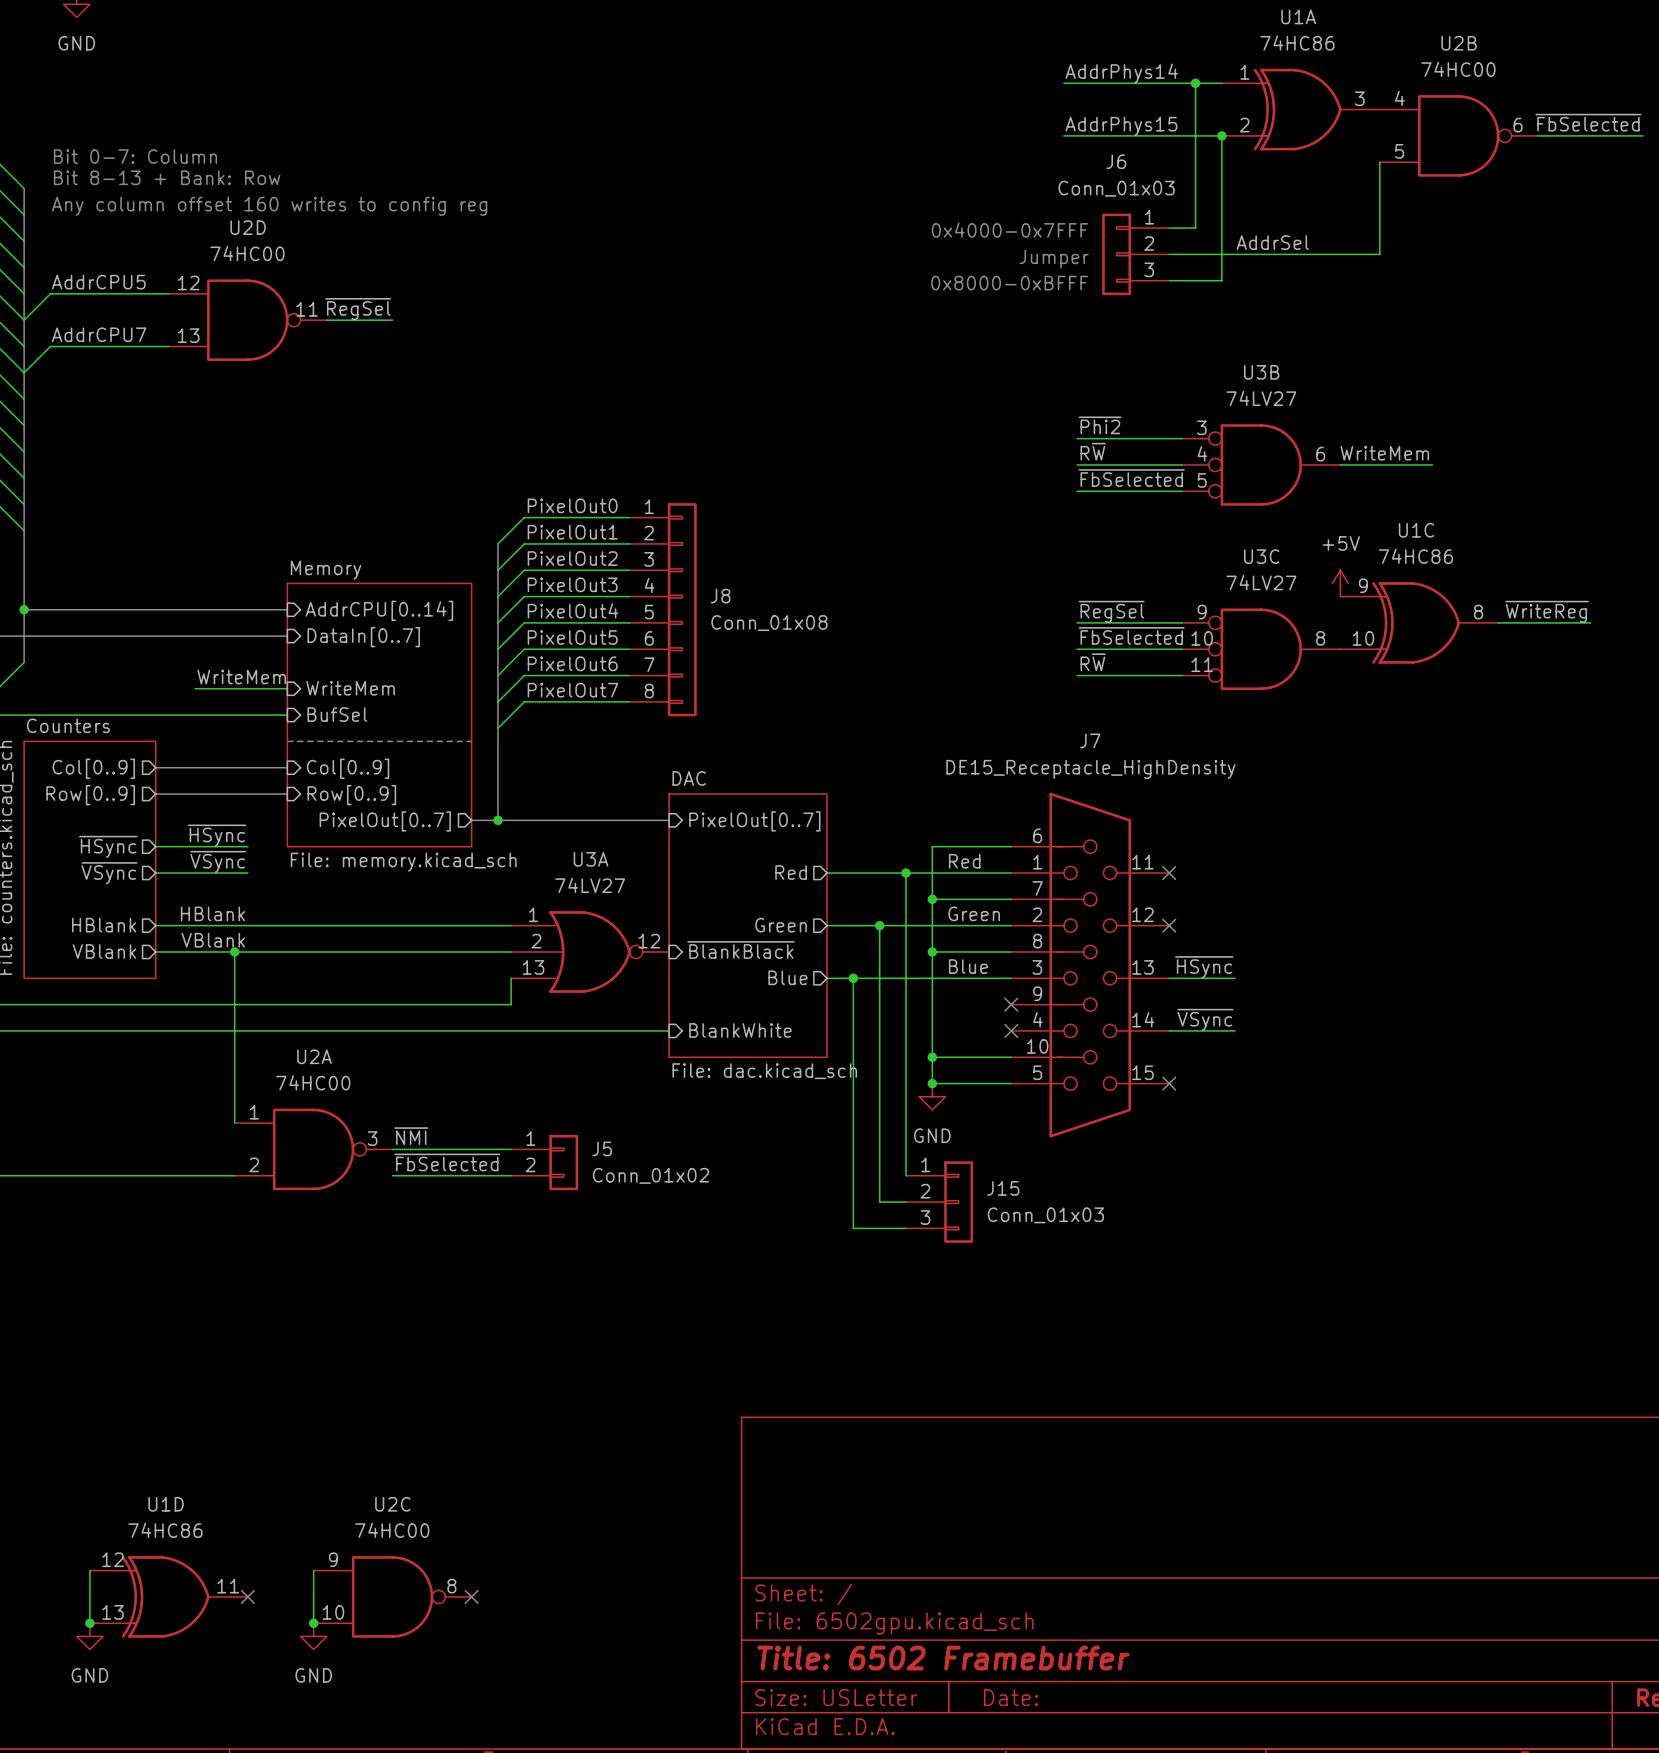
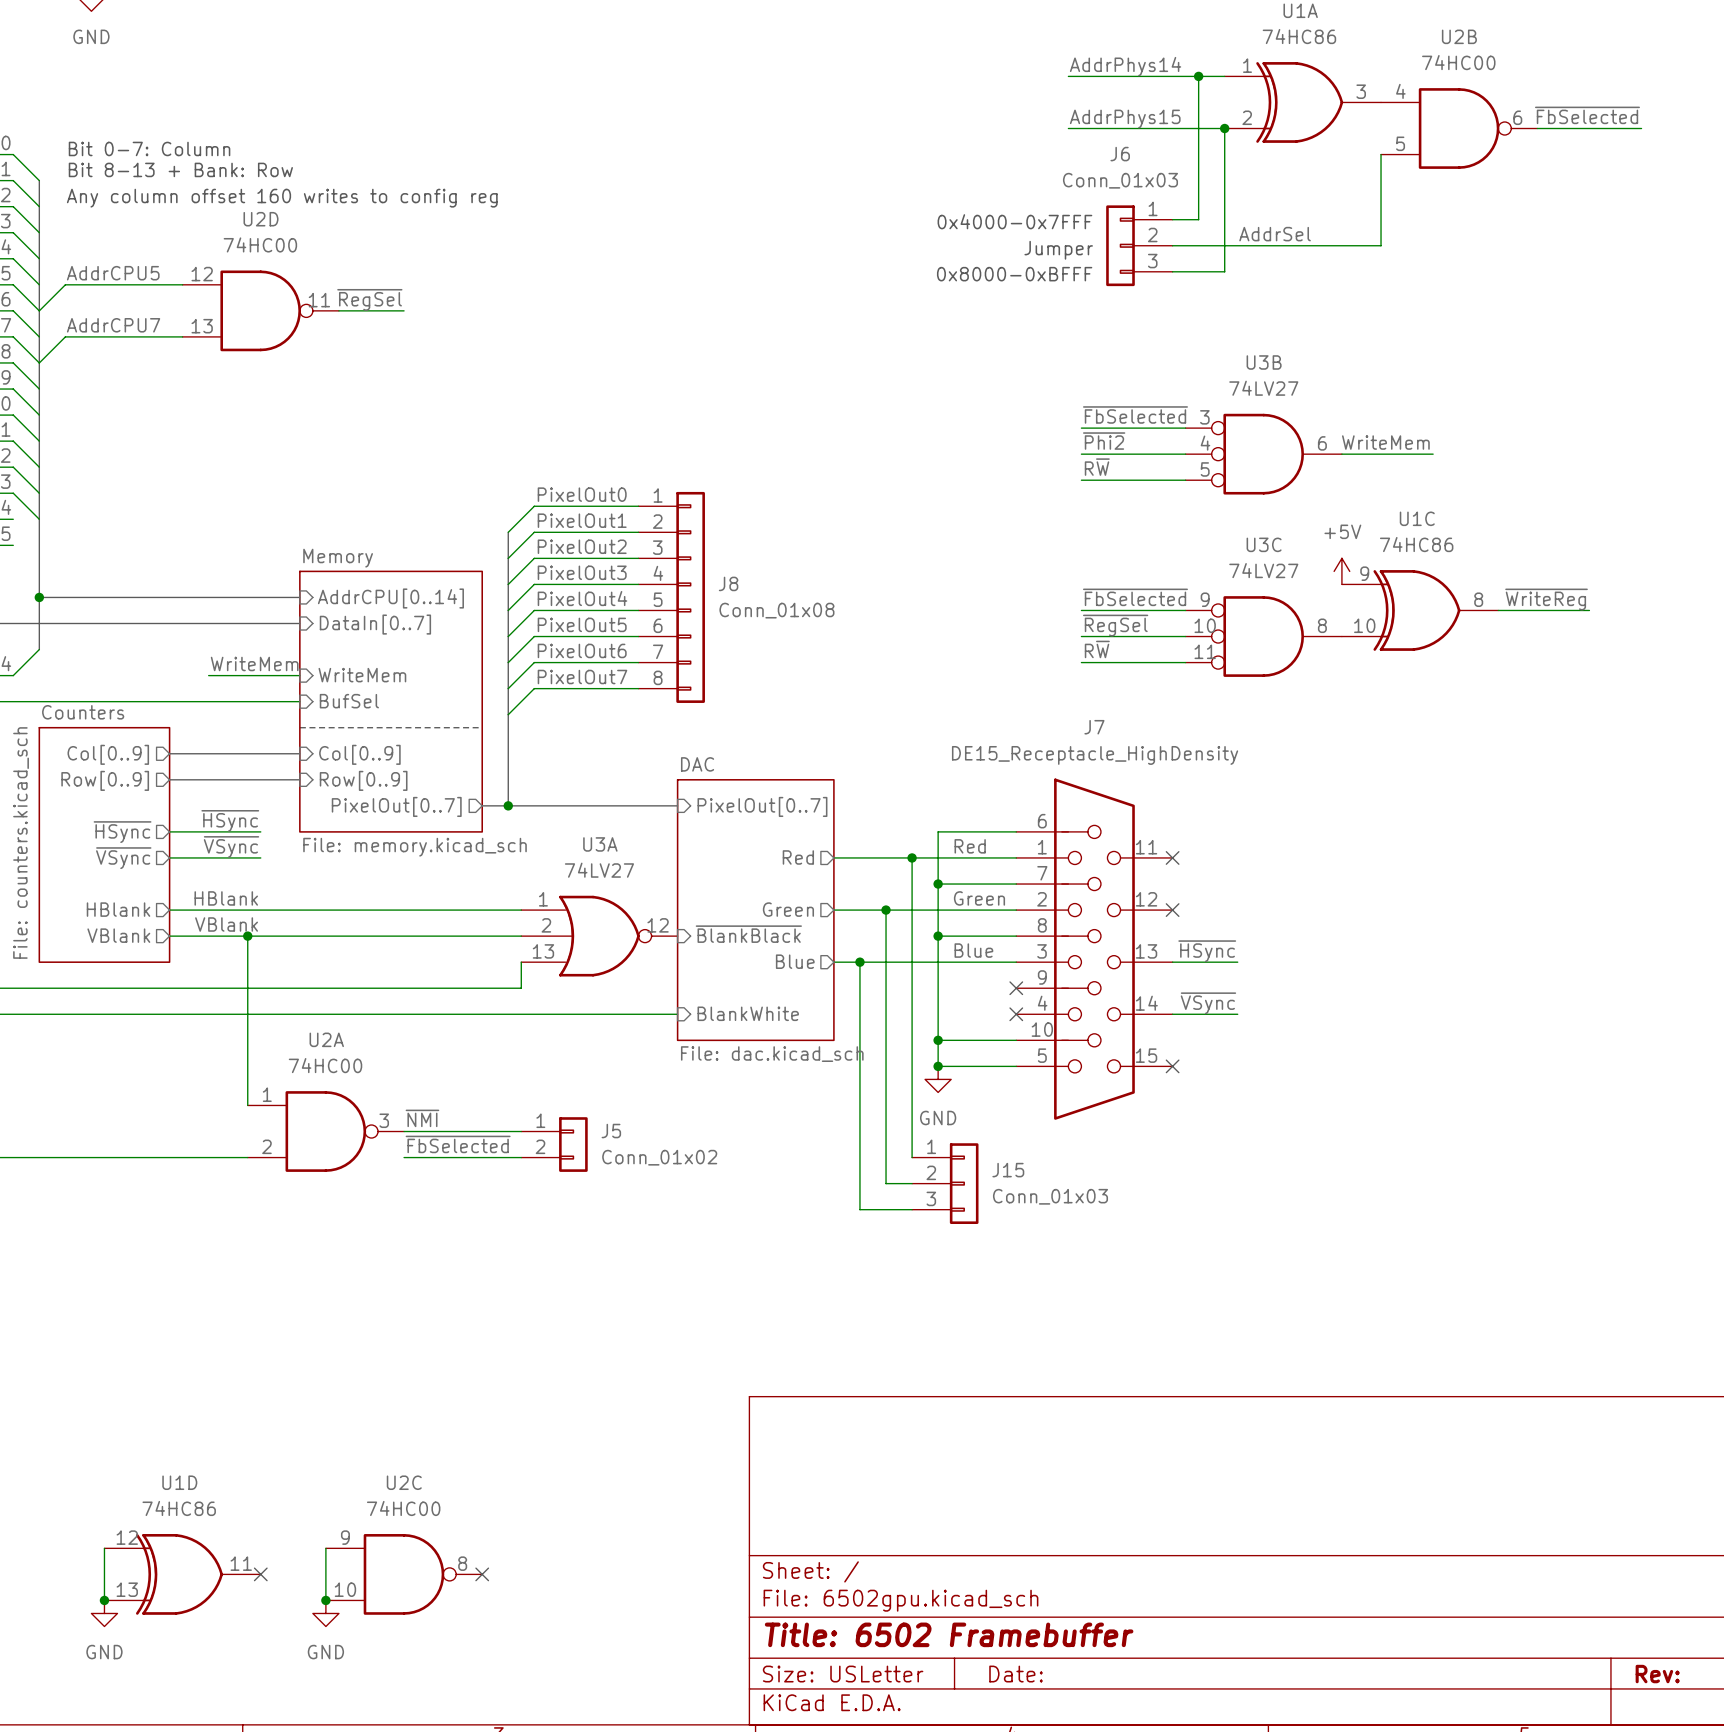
label: ~{Phi2} (1100, 425) -> ~{FbSelected} (1135, 414)
label: R~{W} (1093, 451) -> ~{Phi2} (1104, 441)
label: ~{FbSelected} (1131, 478) -> R~{W} (1097, 467)
label: ~{RegSel} (1111, 611) -> ~{FbSelected} (1135, 597)
label: ~{FbSelected} (1131, 635) -> ~{RegSel} (1115, 625)

